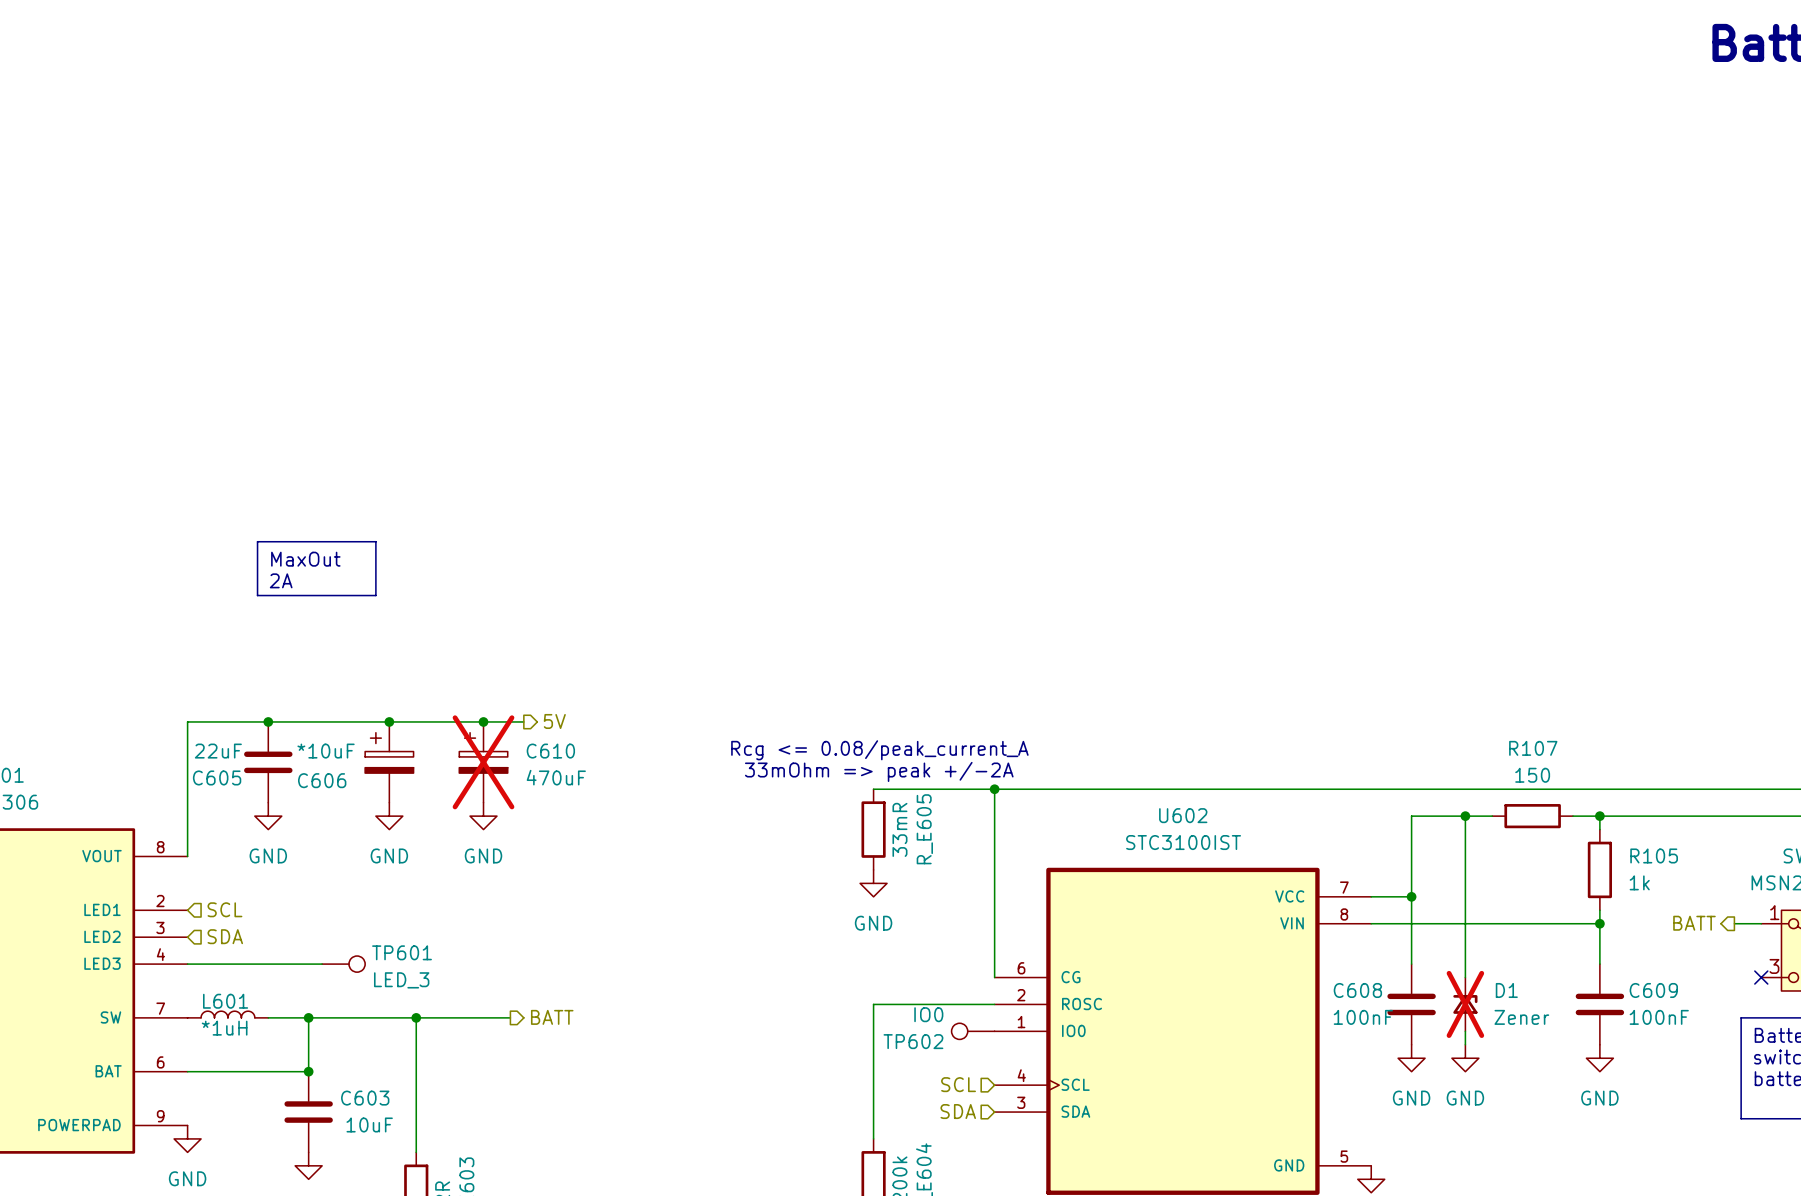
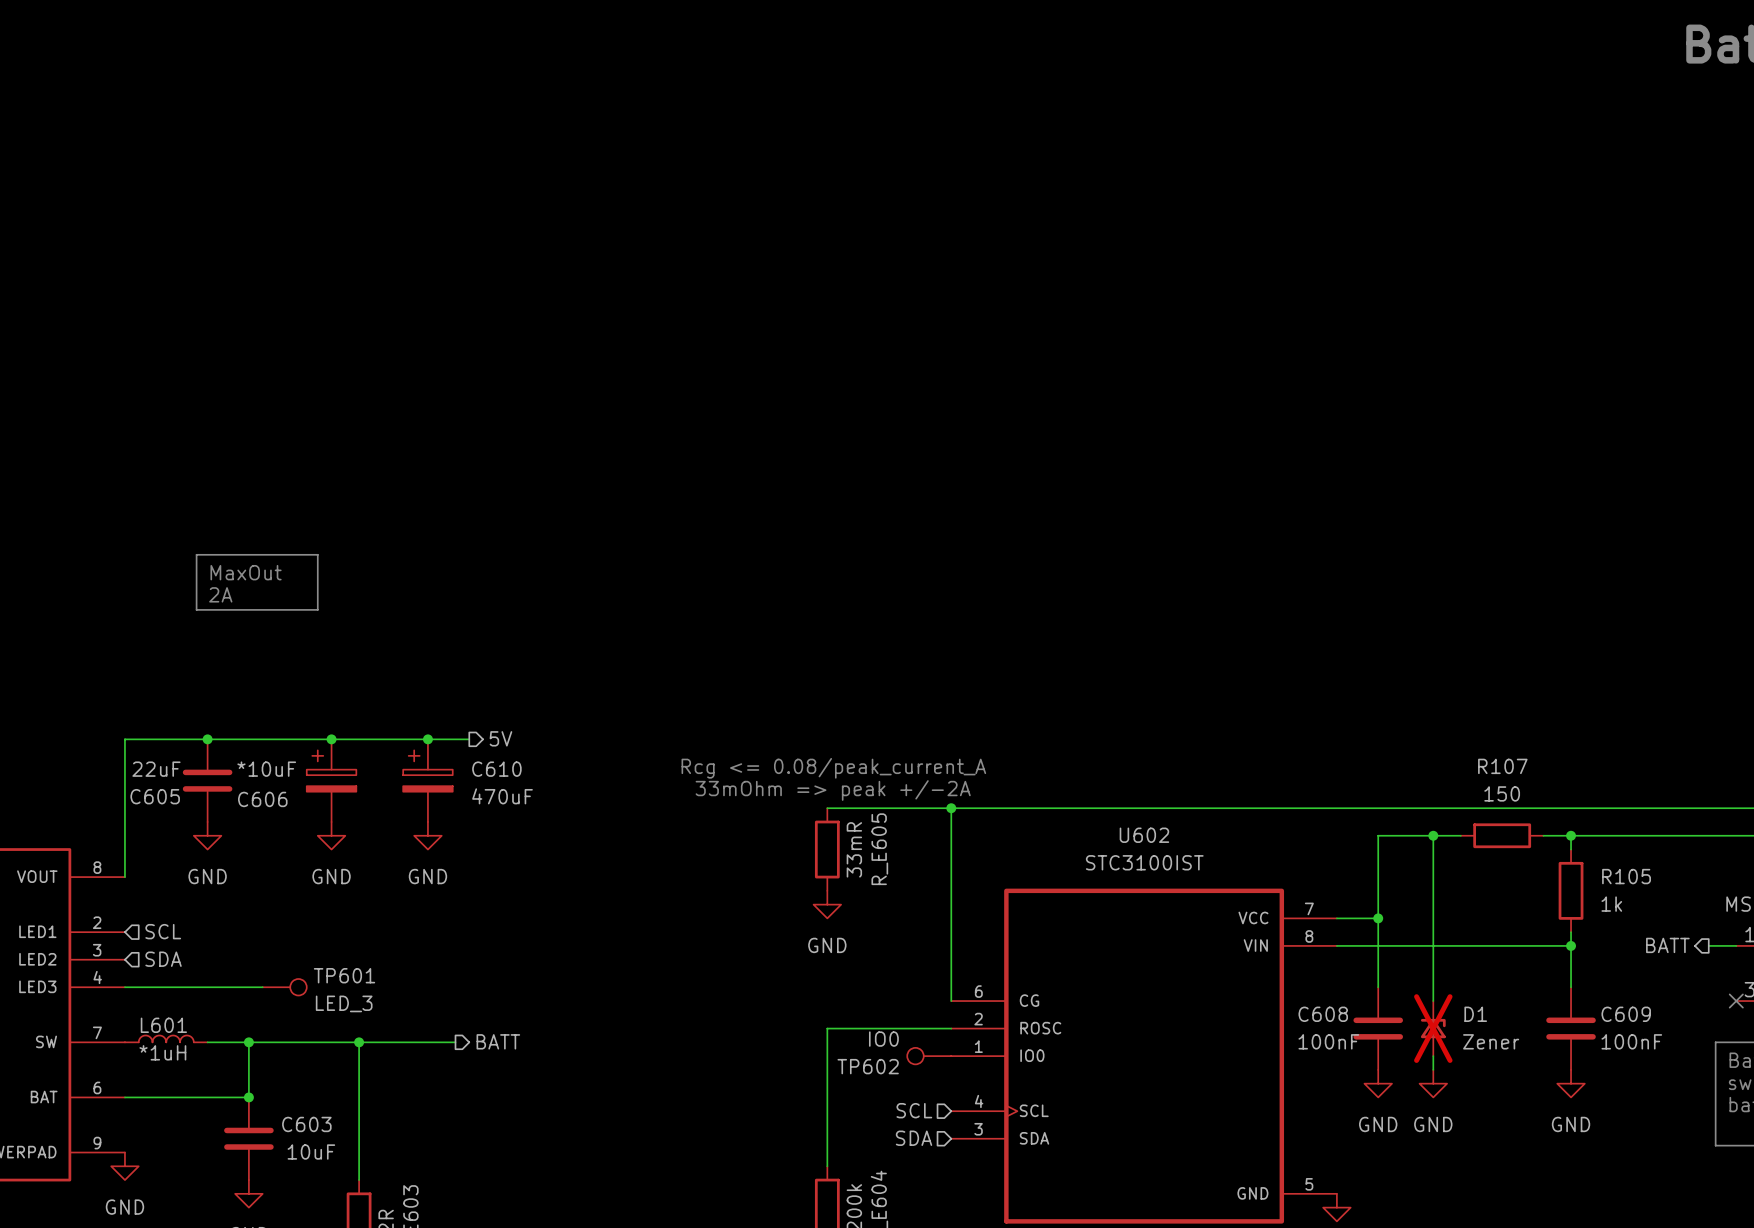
C610 do-not-place cross: (483, 762) -> none

